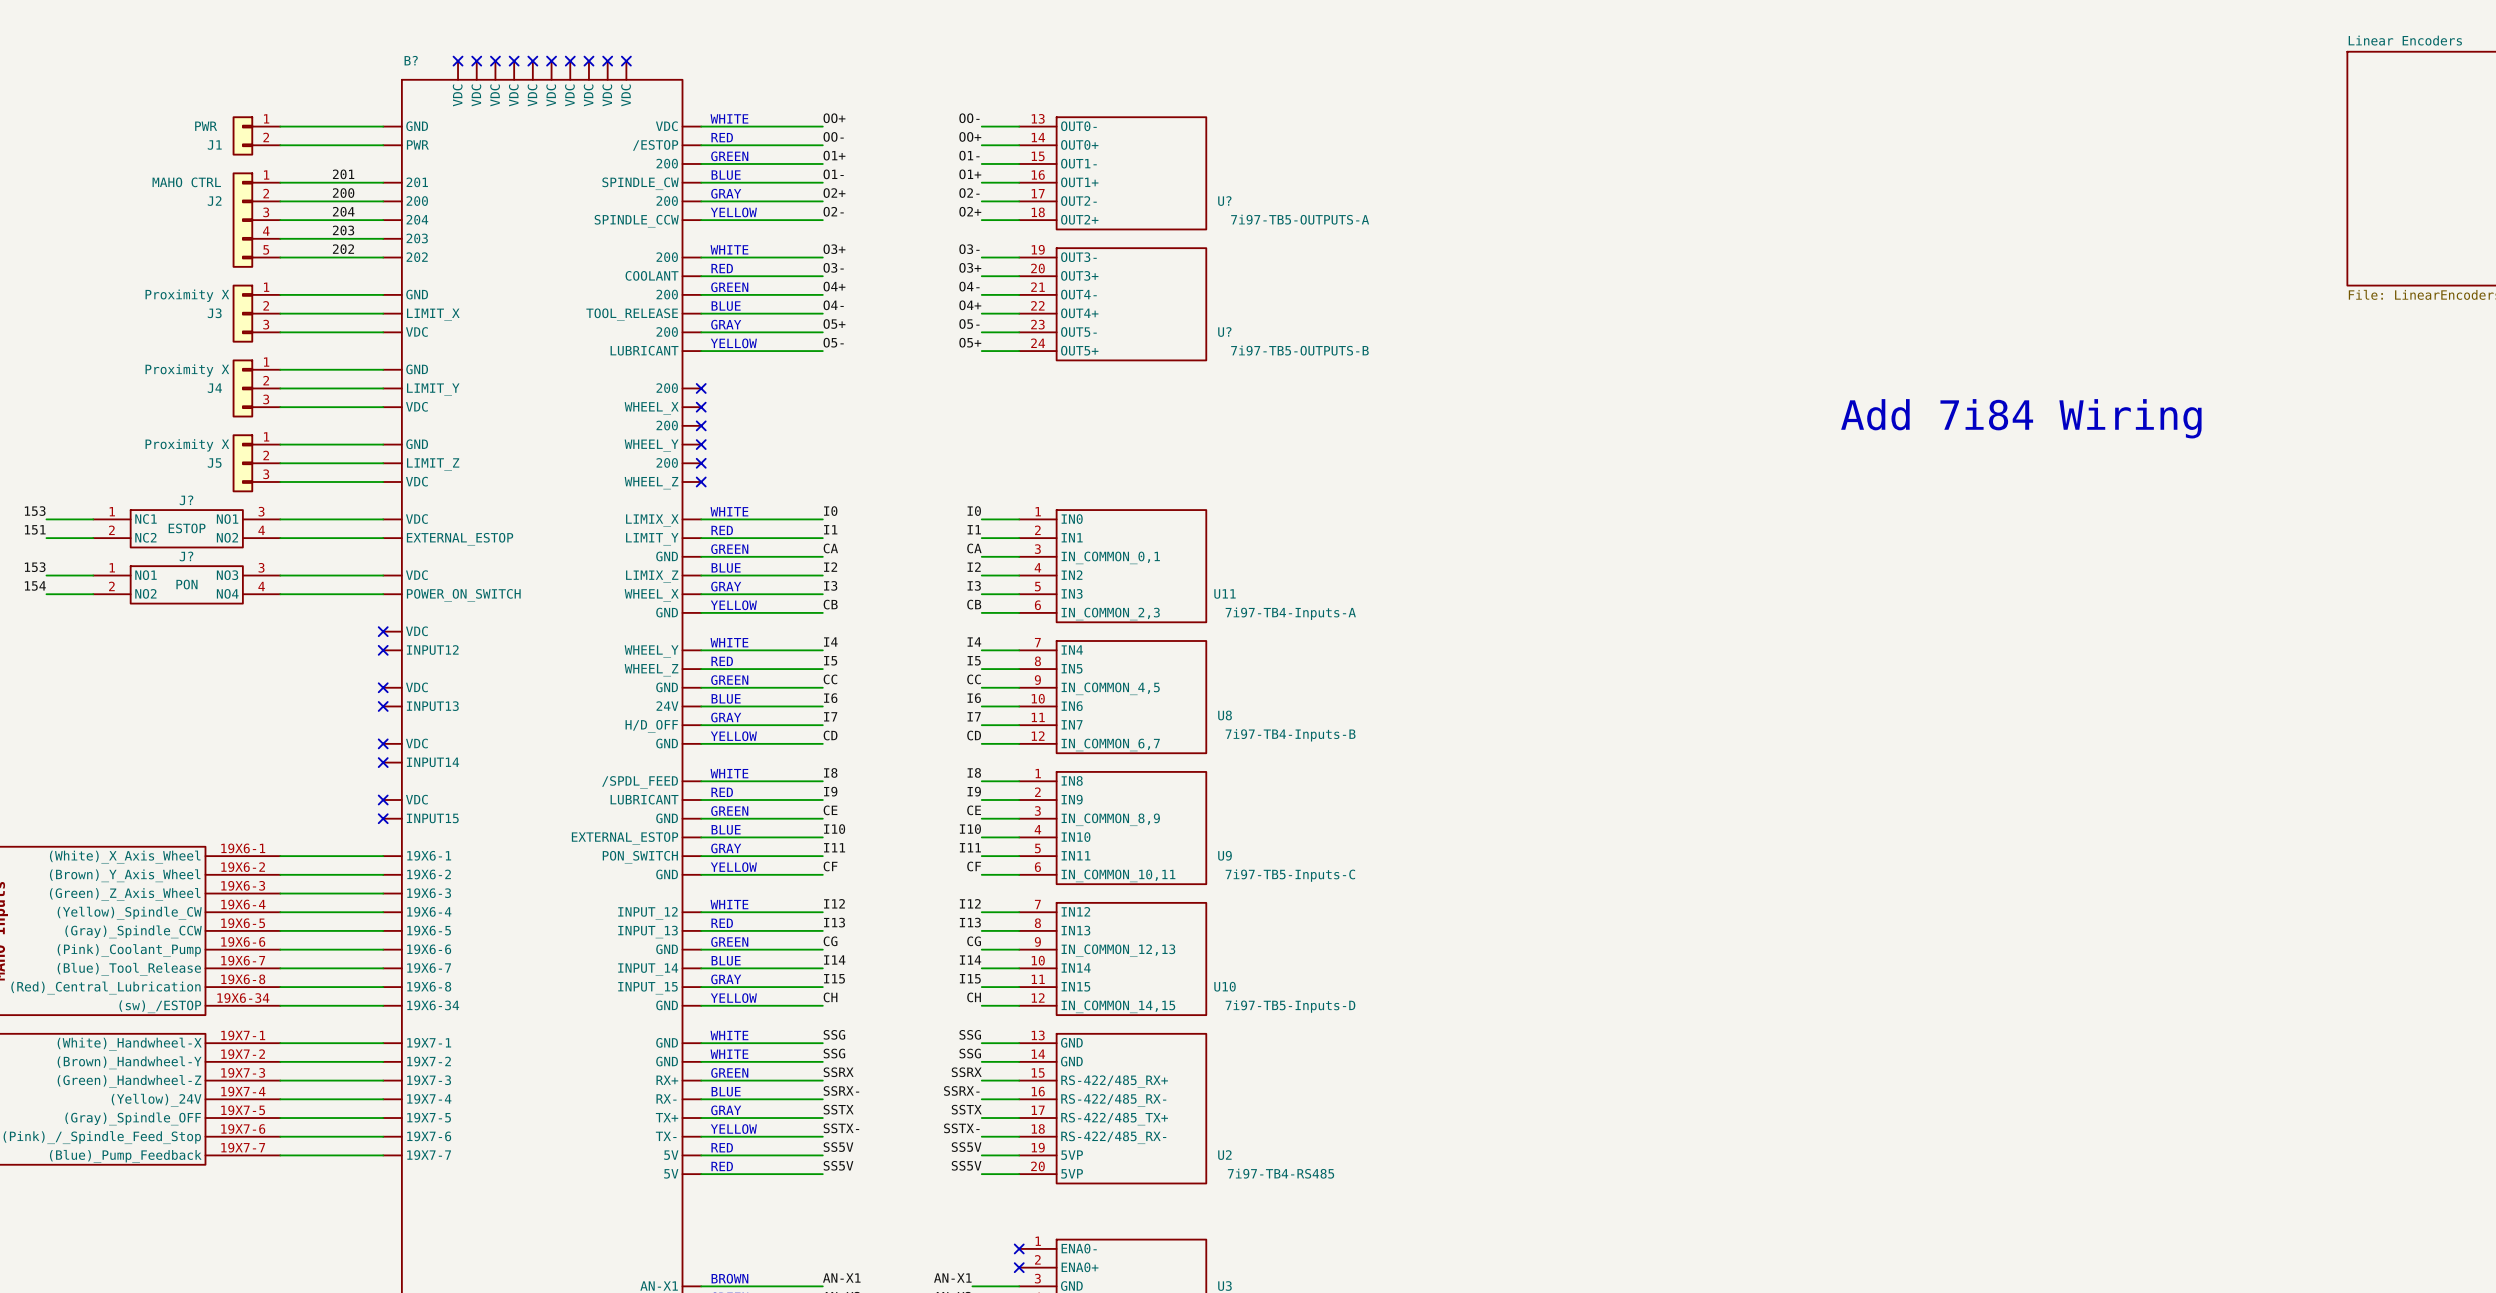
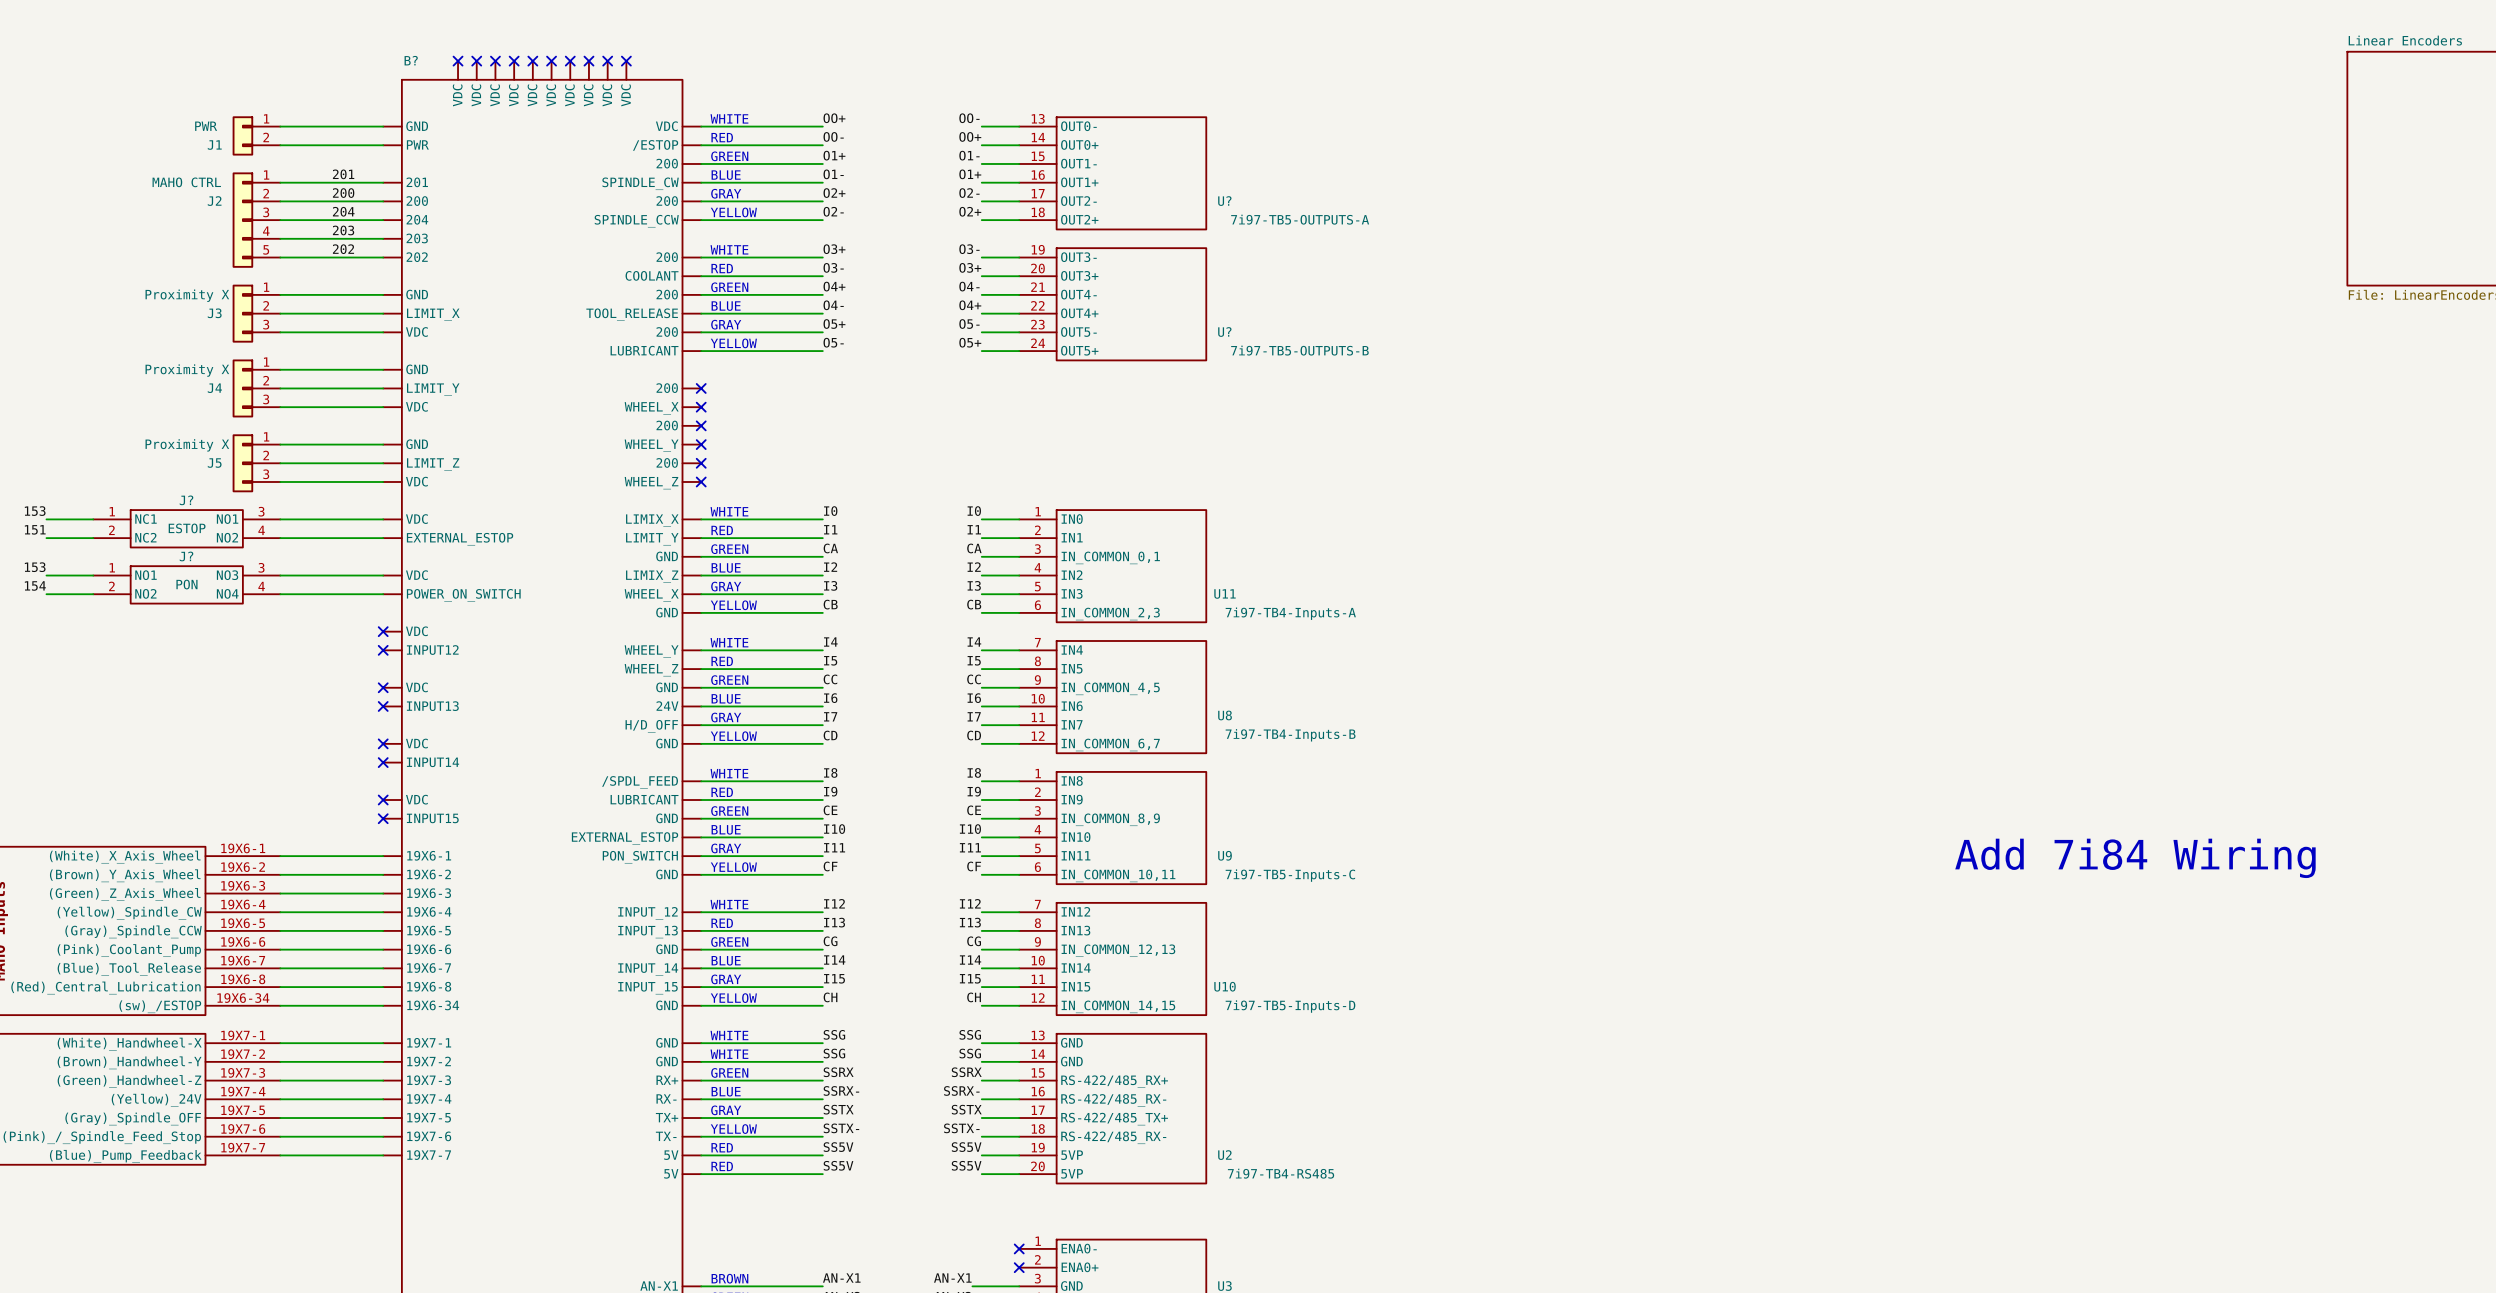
text: Add 7i84 Wiring (2021, 418) -> none
text: none -> Add 7i84 Wiring (2135, 858)

